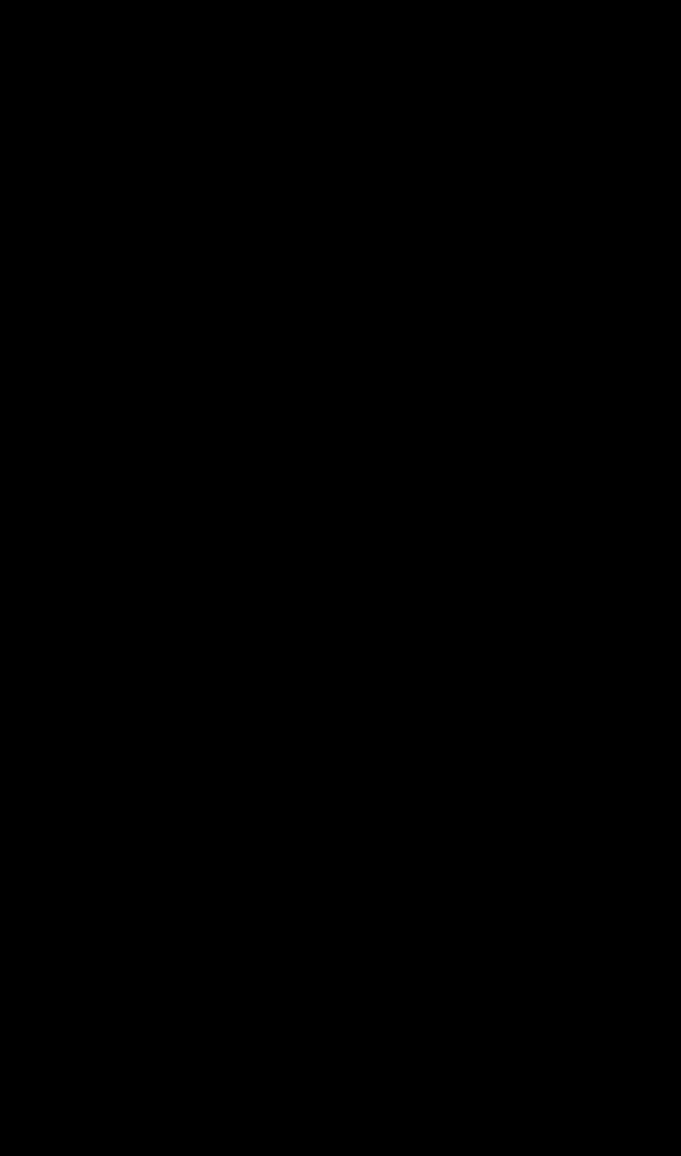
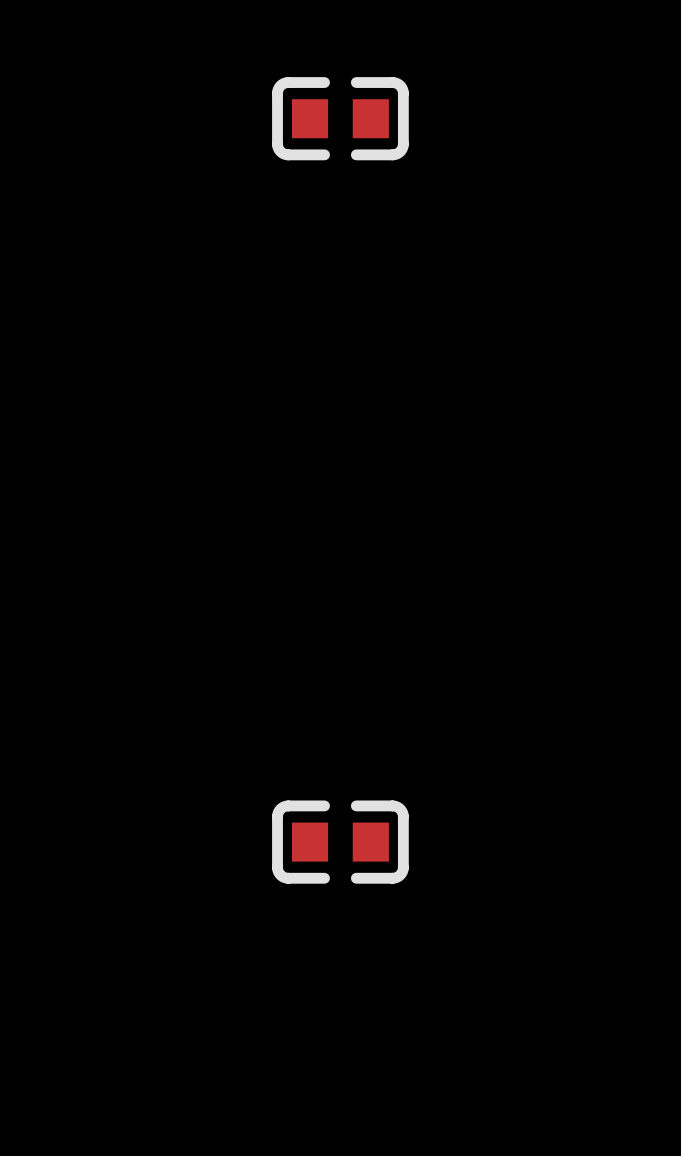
part: none -> (340, 118)
part: none -> (340, 842)

